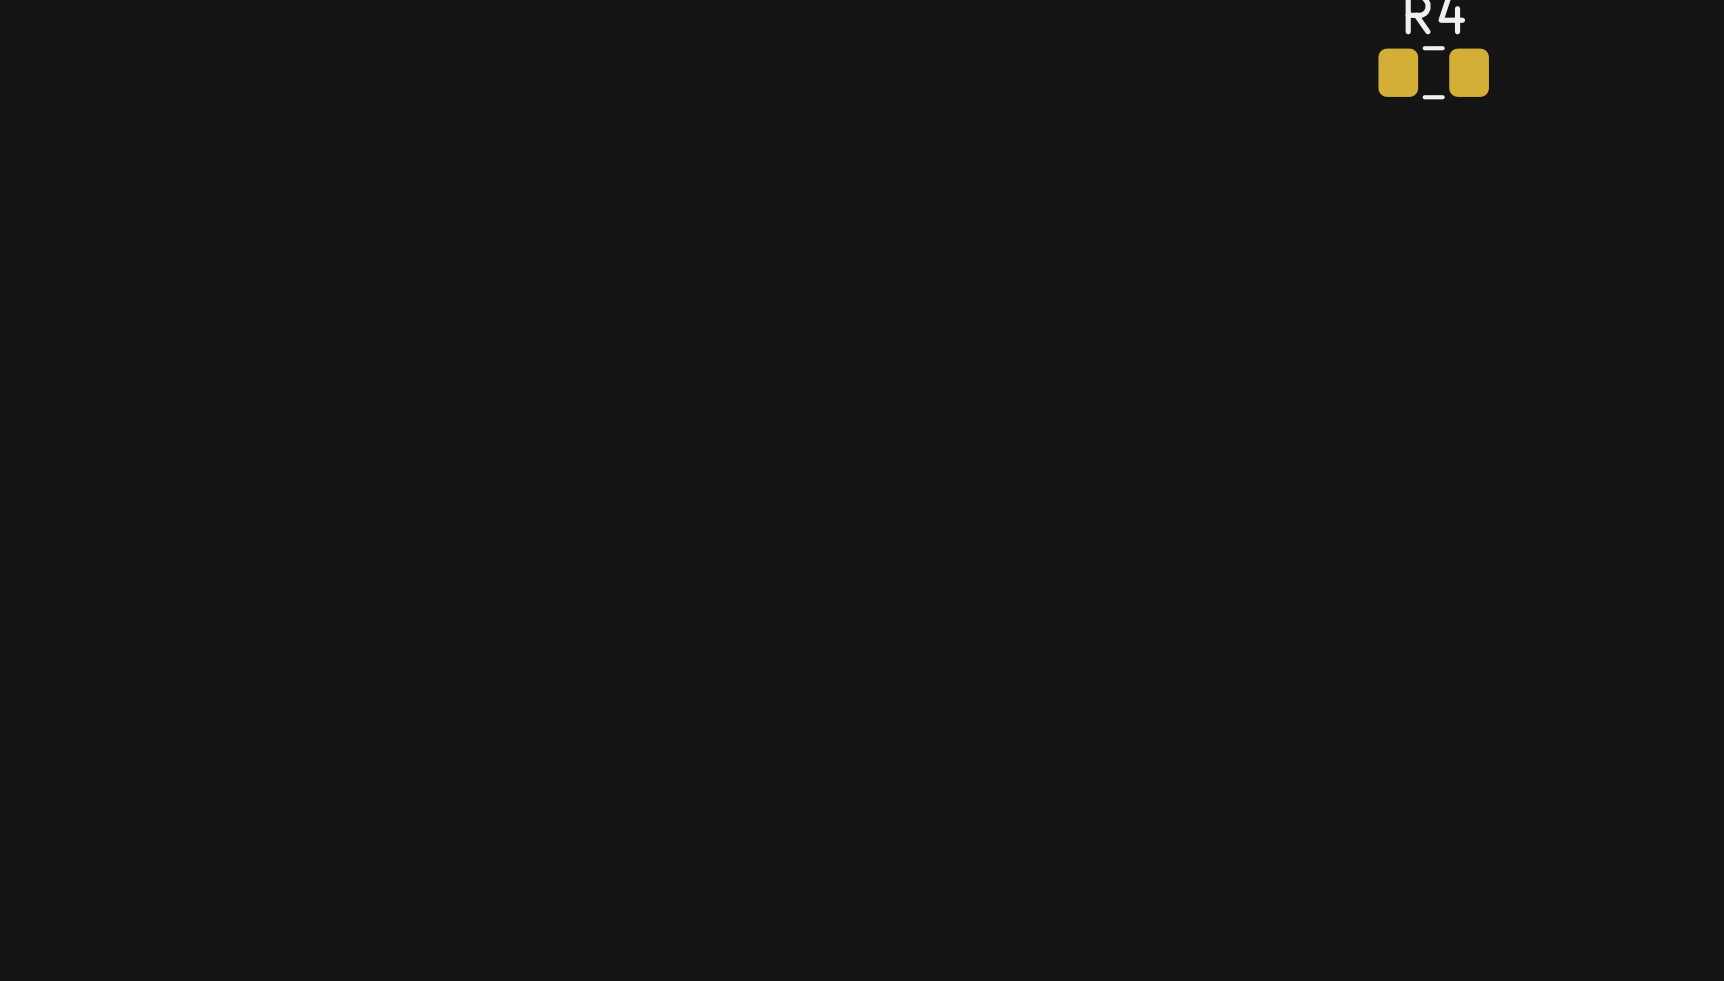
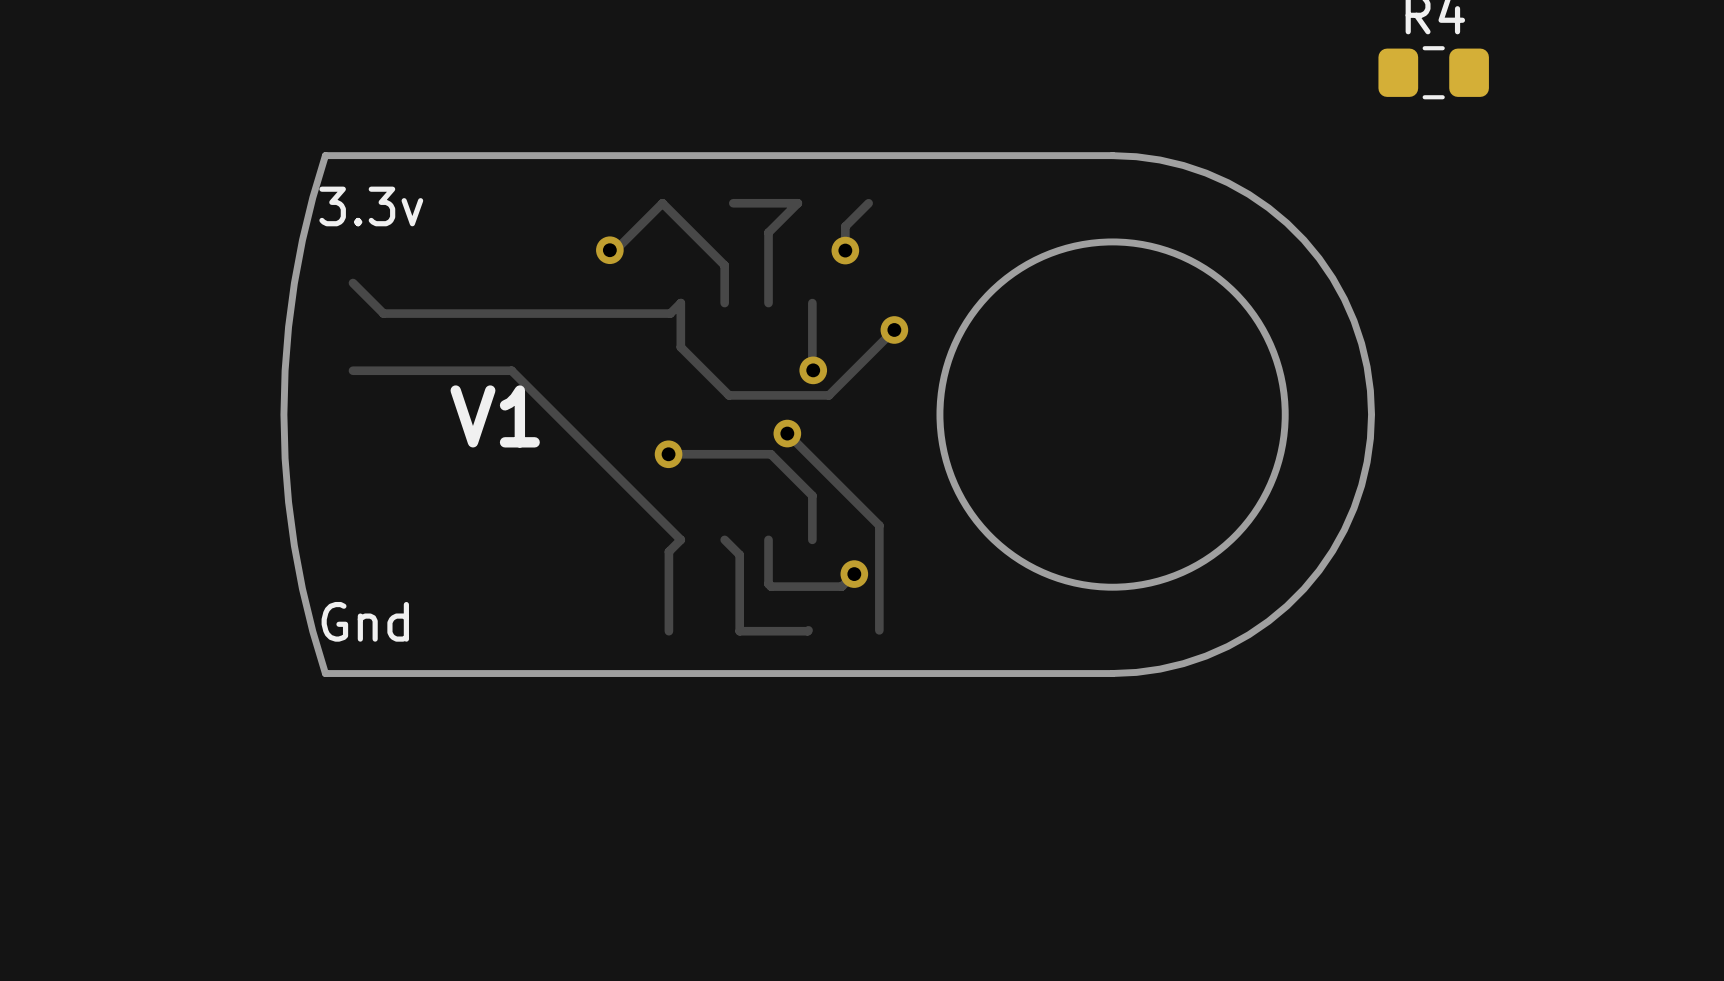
board edge: none -> (325, 155) (1112, 155) (1136, 156) (1183, 165) (1228, 182) (1268, 207) (1303, 240) (1332, 278) (1344, 299) (1361, 343) (1370, 390) (1370, 438) (1361, 485) (1344, 529) (1332, 550) (1303, 589) (1287, 605) (1248, 634) (1228, 646) (1206, 656) (1160, 669) (1112, 673) (325, 673) (302, 588) (294, 545) (288, 502) (283, 414) (288, 326) (294, 283) (302, 240) (325, 155)
track: none -> (733, 203) (797, 203) (768, 232) (768, 303)
track: none -> (868, 203) (845, 226) (845, 250)
text: none -> 3.3v (371, 206)
round board edge: none -> [936, 238, 1289, 591]
track: none -> (609, 250) (615, 250) (662, 203) (724, 265) (724, 303)
via: none -> (609, 250)
via: none -> (845, 250)
track: none -> (352, 283) (383, 313) (670, 313) (680, 303) (680, 347) (728, 395) (828, 395) (894, 329)
track: none -> (812, 303) (813, 370)
via: none -> (894, 329)
track: none -> (352, 370) (511, 370) (680, 539) (668, 551) (668, 631)
via: none -> (813, 370)
text: none -> V1 (495, 416)
track: none -> (787, 433) (879, 525) (879, 630)
via: none -> (787, 433)
track: none -> (668, 454) (770, 454) (812, 495) (812, 539)
via: none -> (668, 454)
track: none -> (724, 539) (739, 554) (739, 631) (808, 630)
track: none -> (768, 539) (768, 584) (771, 586) (841, 586) (854, 574)
via: none -> (854, 574)
text: none -> Gnd (365, 621)

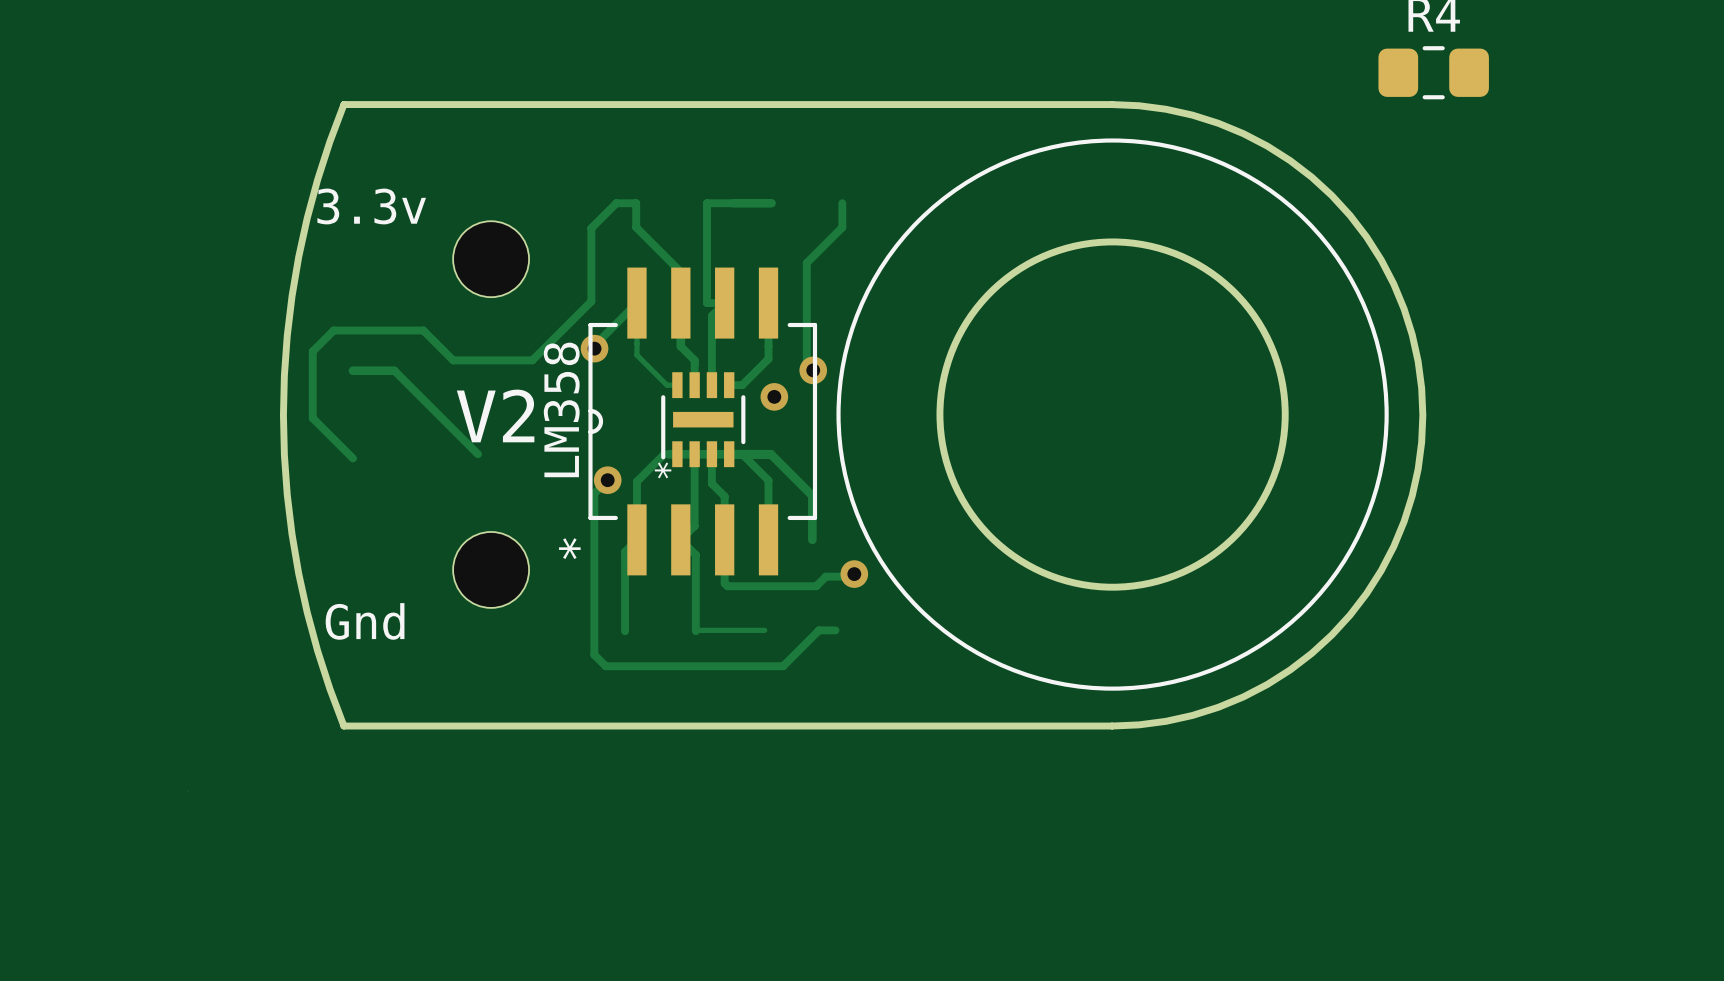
drawing: none -> [836, 138, 1389, 691]
board edge: (325, 155) (1112, 155) (1136, 156) (1183, 165) (1228, 182) (1268, 207) (1303, 240) (1332, 278) (1344, 299) (1361, 343) (1370, 390) (1370, 438) (1361, 485) (1344, 529) (1332, 550) (1303, 589) (1287, 605) (1248, 634) (1228, 646) (1206, 656) (1160, 669) (1112, 673) (325, 673) (302, 588) (294, 545) (288, 502) (283, 414) (288, 326) (294, 283) (302, 240) (325, 155) -> (343, 104) (317, 179) (298, 257) (287, 335) (283, 415) (287, 494) (298, 573) (317, 650) (343, 726) (1112, 726) (1166, 721) (1218, 707) (1243, 696) (1267, 684) (1311, 653) (1350, 615) (1366, 593) (1381, 570) (1404, 521) (1418, 469) (1422, 415) (1418, 361) (1412, 334) (1393, 283) (1366, 237) (1350, 215) (1311, 177) (1267, 146) (1218, 123) (1166, 109) (1112, 104) (343, 104)
track: none -> (733, 203) (706, 203) (706, 302)
track: (771, 203) (797, 203) (768, 232) (768, 303) -> (729, 385) (742, 385) (768, 358) (768, 303)
track: none -> (842, 203) (842, 227) (806, 262) (806, 377)
track: (868, 203) (845, 226) (845, 250) -> none
track: (609, 250) (615, 250) (662, 203) (724, 265) (724, 303) -> none
via: (609, 250) -> none
via: (845, 250) -> none
part: none -> (491, 259)
track: (352, 283) (383, 313) (670, 313) (680, 303) -> (352, 458) (312, 418) (312, 351) (333, 330) (423, 330) (453, 360) (532, 360) (591, 301) (591, 228) (616, 203) (636, 203) (636, 227) (680, 272) (680, 303)
track: none -> (707, 303) (724, 303) (711, 315) (711, 385)
track: (812, 303) (813, 370) -> none
track: (894, 329) (828, 395) (728, 395) (680, 346) -> (694, 385) (694, 360) (680, 346)
via: (894, 329) -> none
track: none -> (594, 348) (594, 345) (636, 303) (636, 355) (666, 385) (677, 385)
via: none -> (594, 348)
track: (394, 370) (511, 370) (680, 539) (668, 551) (668, 631) -> (394, 370) (477, 454)
text: V1 (495, 416) -> V2 (495, 415)
part: none -> (703, 419)
part: none -> LM358 (702, 421)
track: (787, 433) (879, 525) (879, 630) -> none
via position: (787, 433) -> (774, 396)
track: none -> (664, 454) (636, 481) (636, 539) (625, 551) (625, 631)
via: (668, 454) -> none
track: none -> (694, 454) (694, 526) (680, 539) (695, 554) (695, 631) (764, 630)
track: none -> (711, 454) (711, 483) (724, 496) (724, 583) (727, 586) (816, 586) (825, 576) (845, 576)
track: none -> (607, 480) (594, 493) (594, 654) (605, 666) (783, 666) (819, 630) (835, 630)
via: none -> (607, 480)
track: (724, 539) (739, 554) (739, 631) (808, 630) -> none
track: (768, 539) (768, 584) (771, 586) (841, 586) (854, 574) -> (768, 539) (768, 480) (742, 454)
part: none -> (491, 569)

